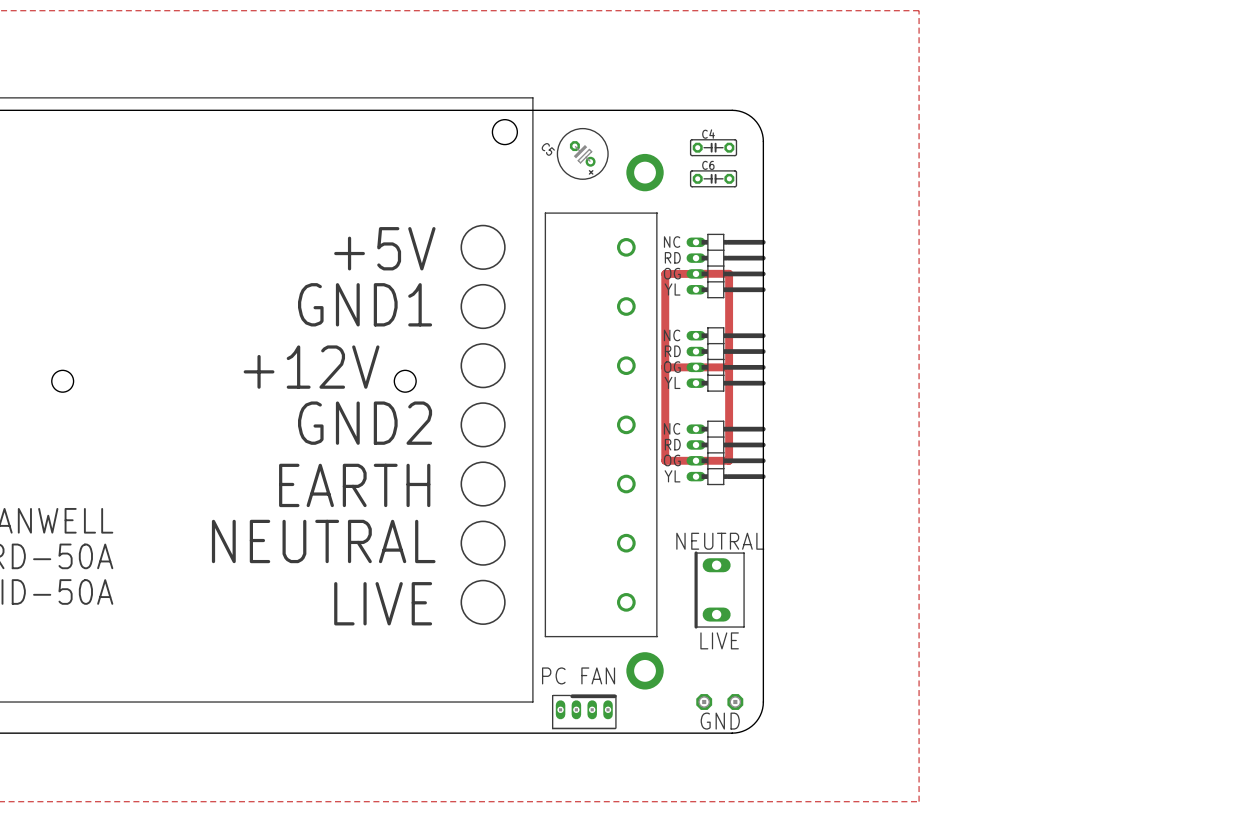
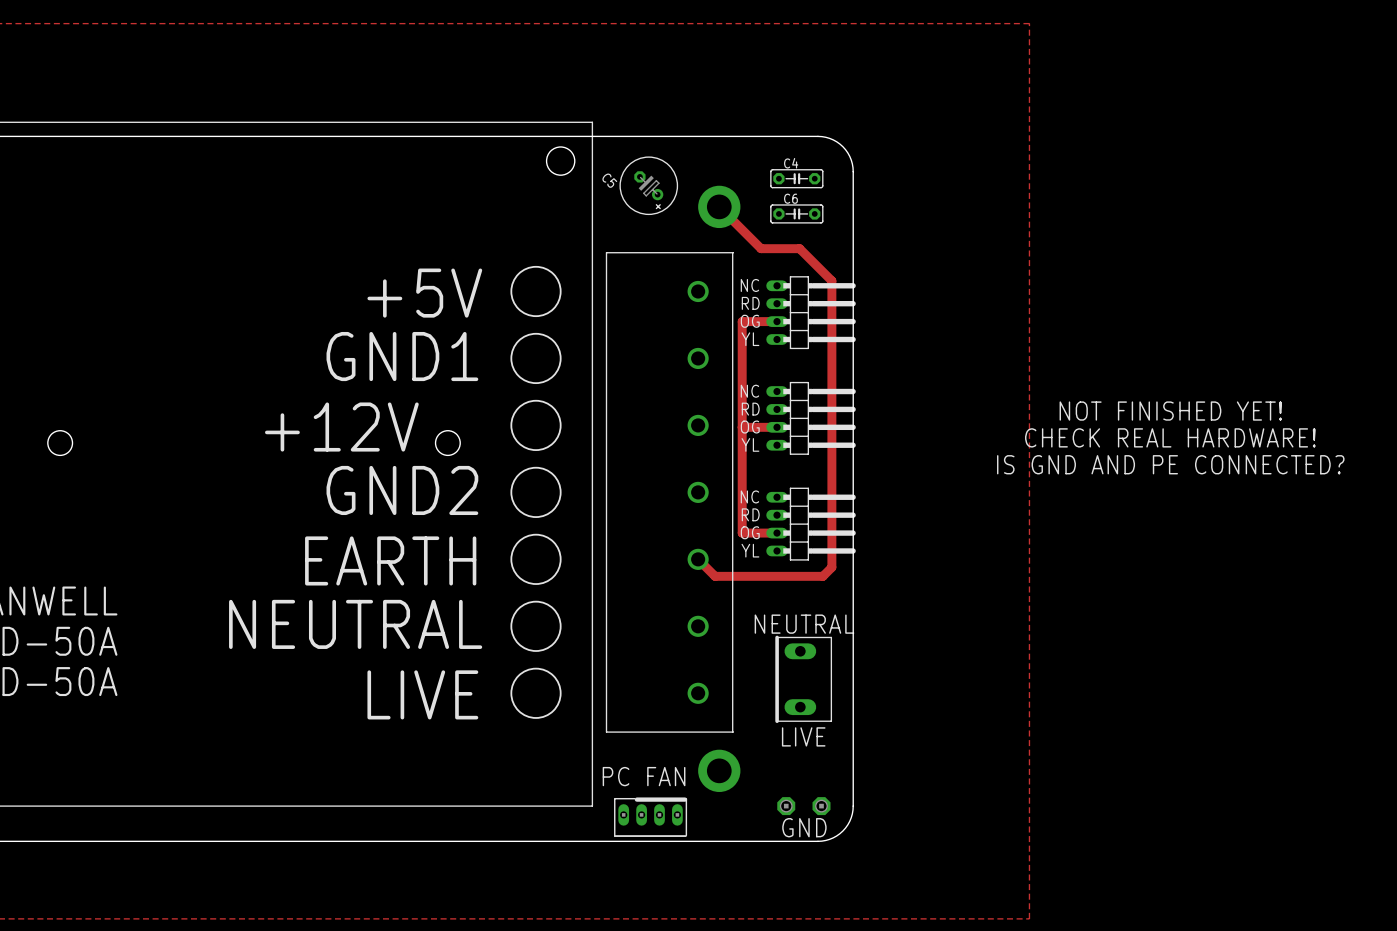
track: none -> (719, 206) (761, 248) (799, 248) (831, 280) (831, 567) (822, 576) (715, 576) (698, 559)
track: (696, 273) (729, 273) (729, 460) (696, 460) -> none
text: none -> NOT FINISHED YET! (1170, 411)
track: (696, 367) (729, 367) -> none
text: none -> CHECK REAL HARDWARE! (1170, 437)
text: none -> IS GND AND PE CONNECTED? (1170, 464)

